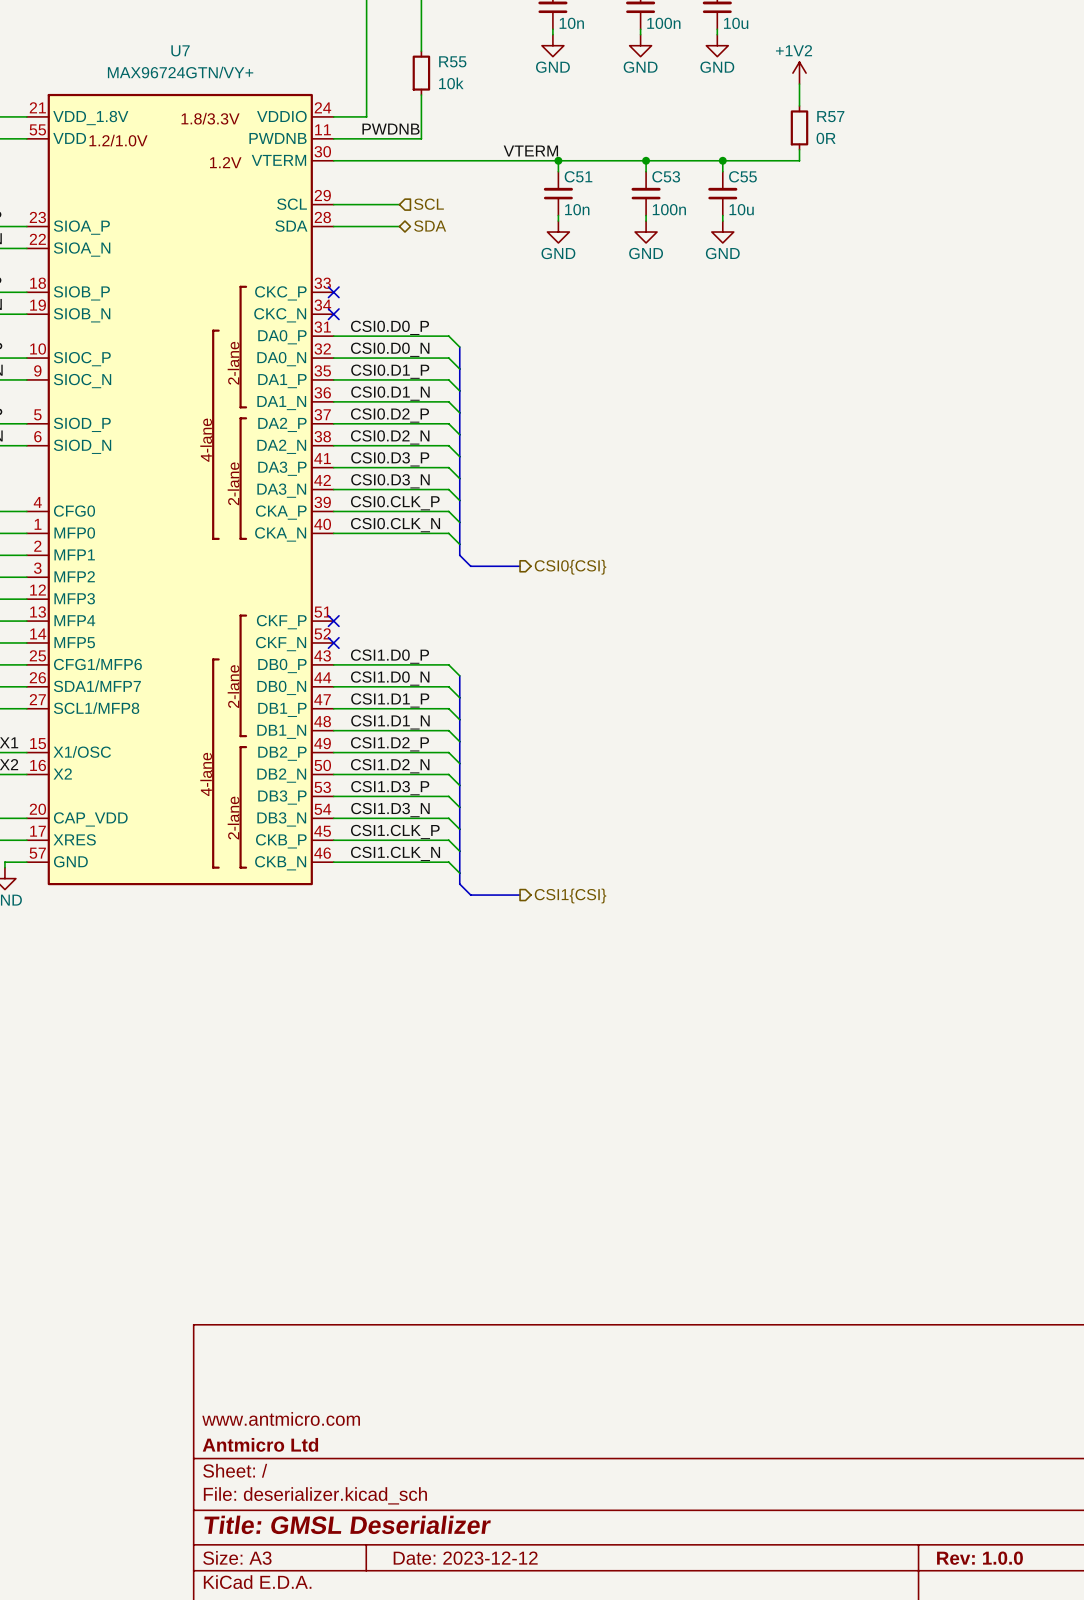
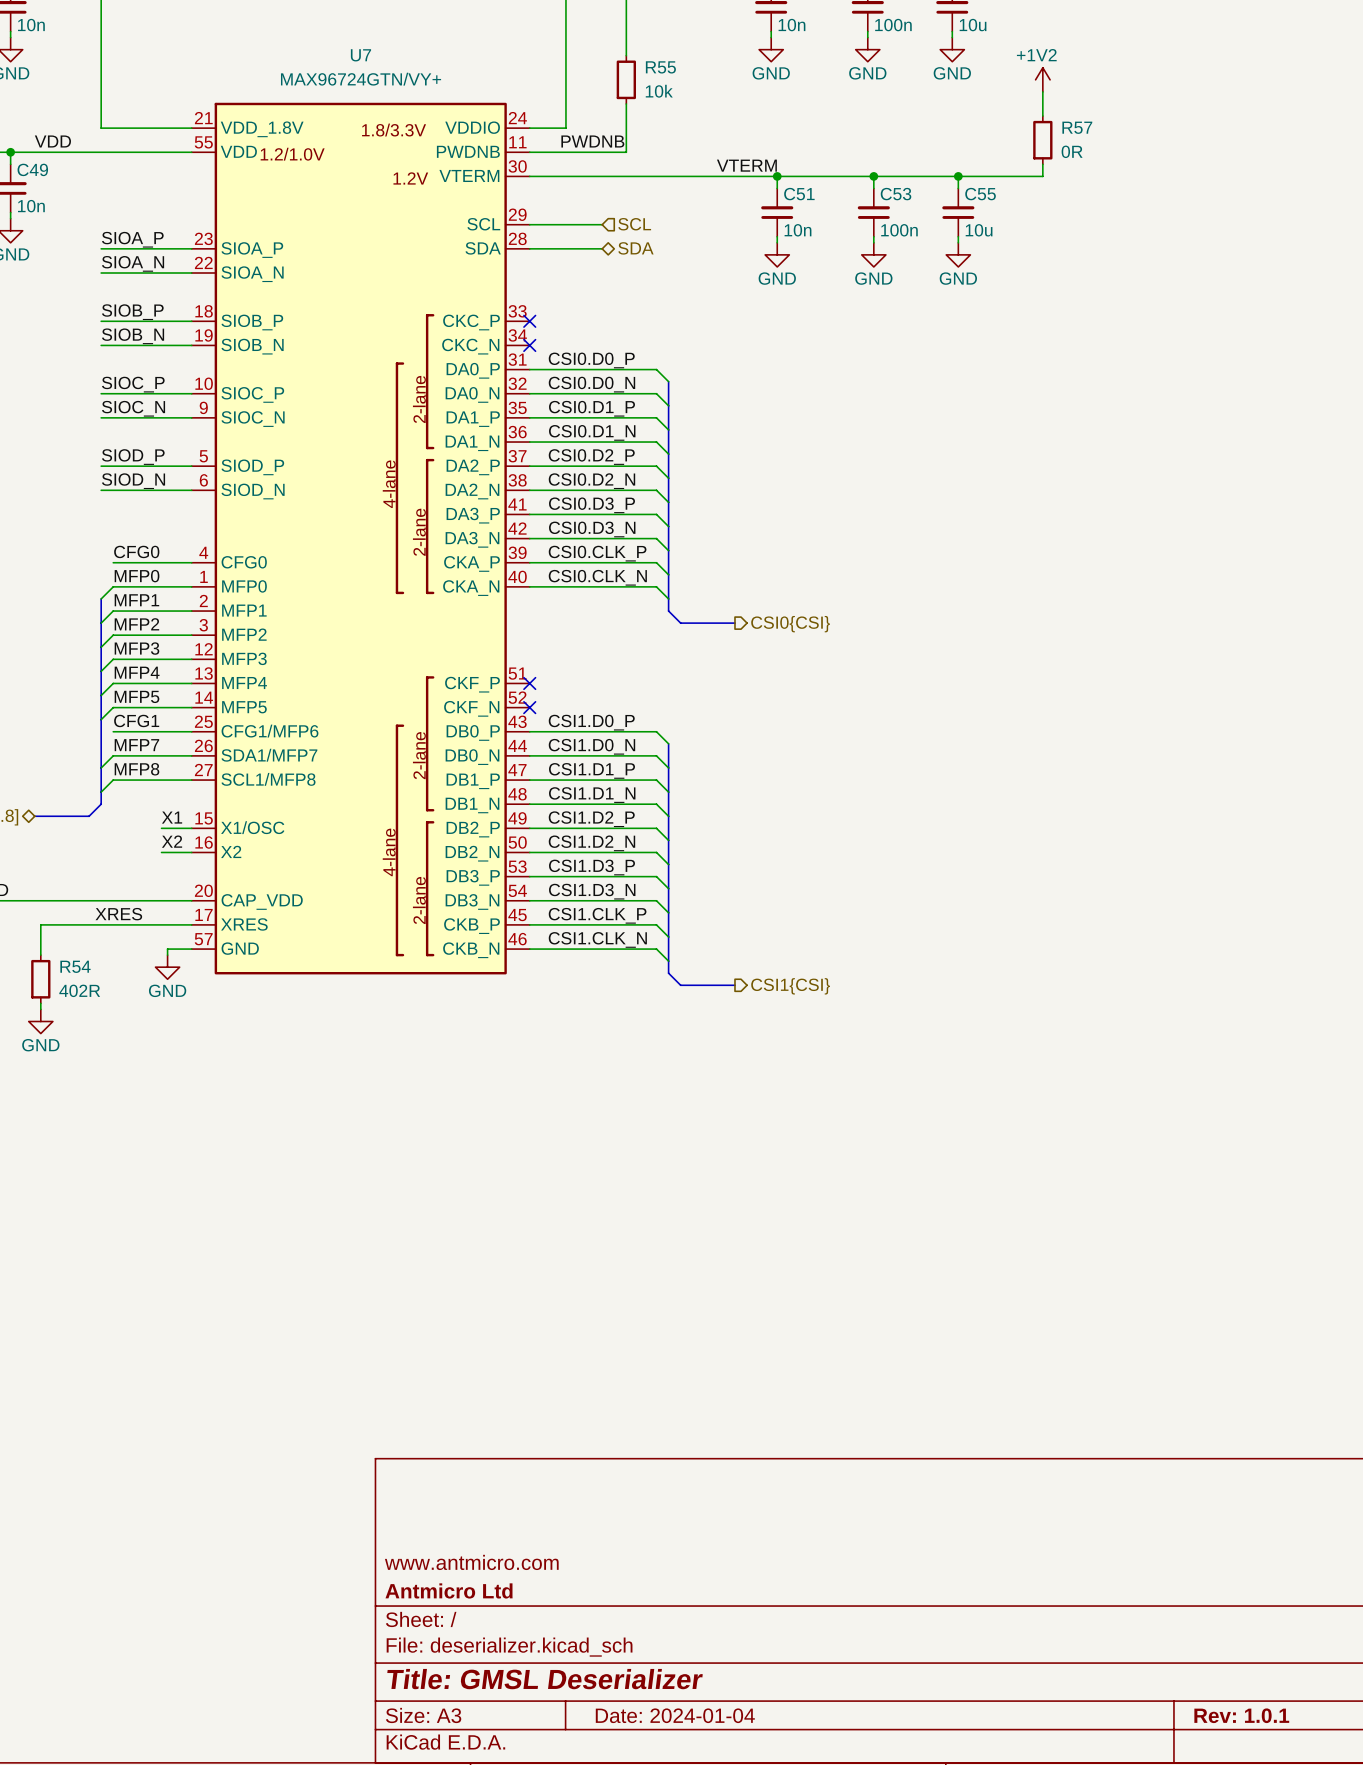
title block: Date: 2023-12-12 (465, 1558) -> Date: 2024-01-04 (675, 1715)
title block: Rev: 1.0.0 (979, 1558) -> Rev: 1.0.1 (1241, 1715)

